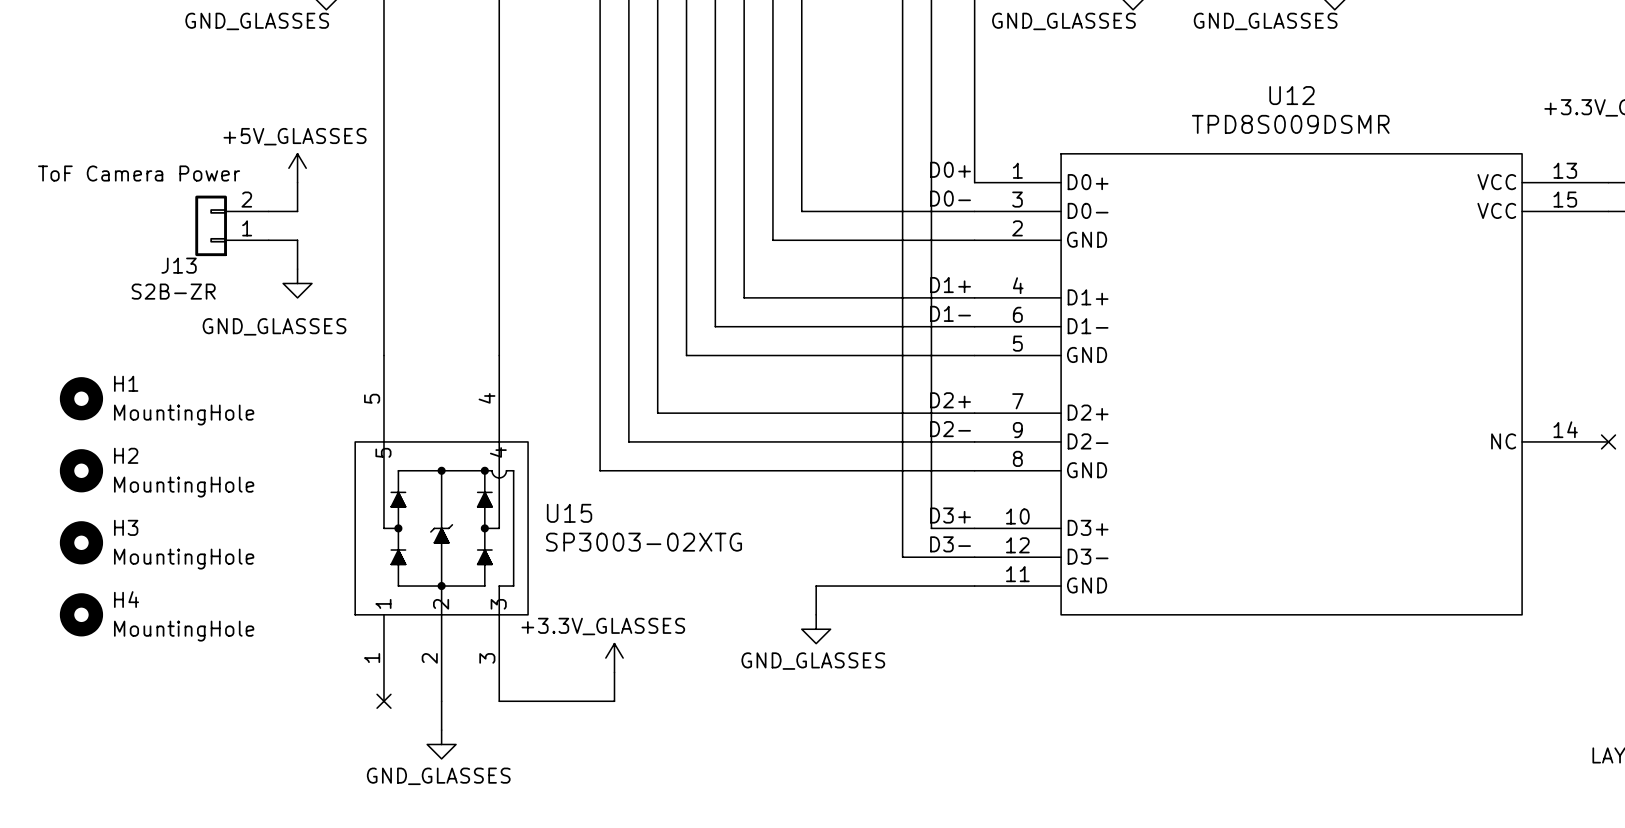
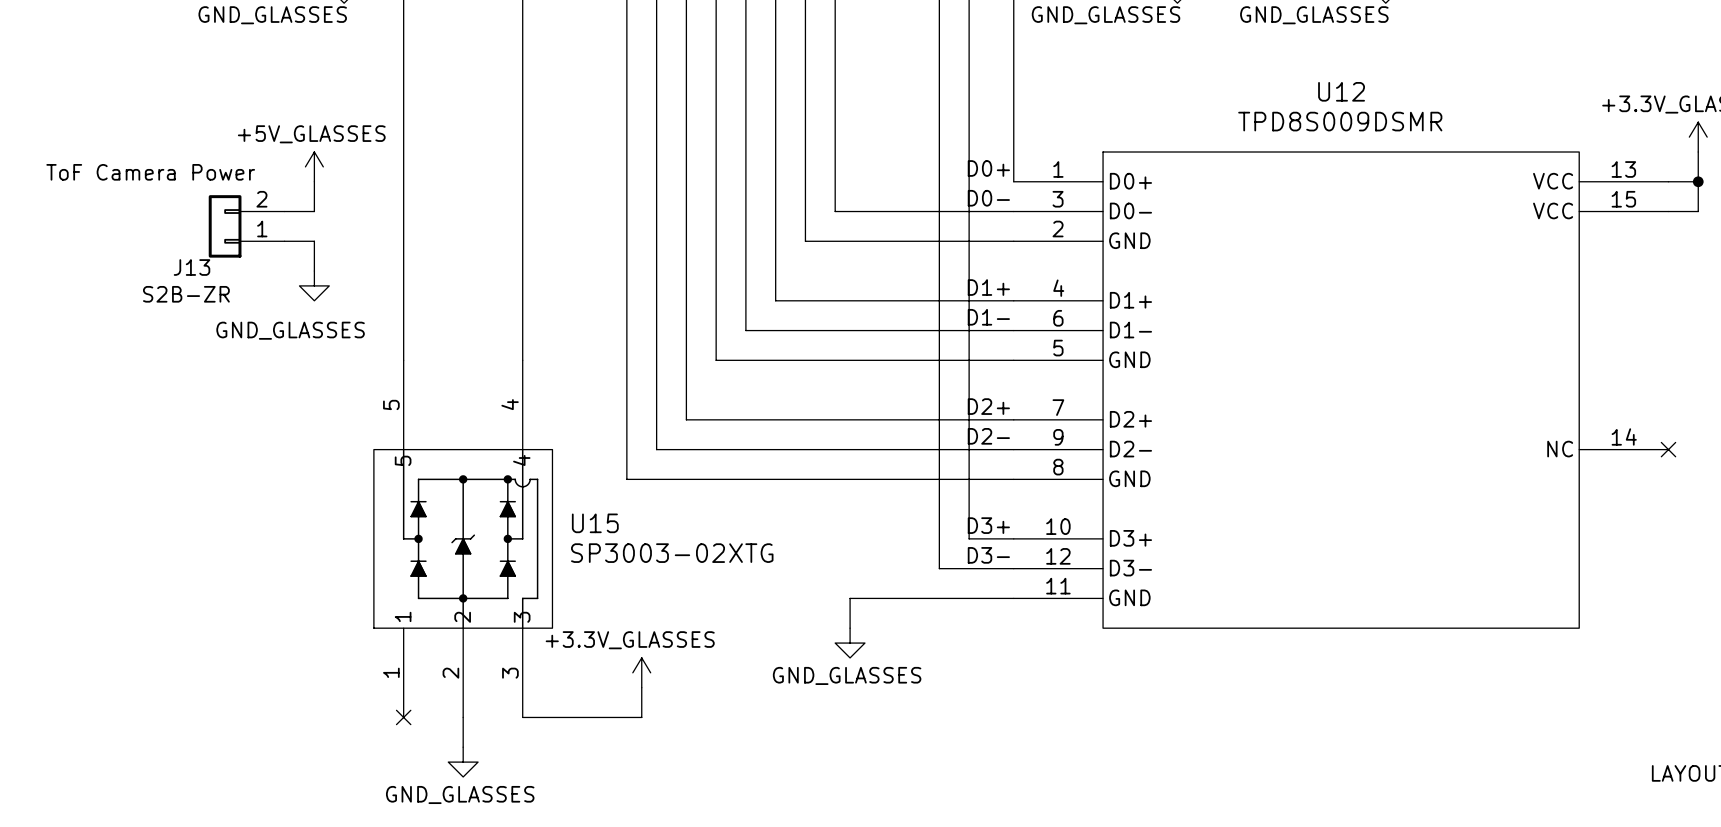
H1: MountingHole (81, 398) -> none
H2: MountingHole (81, 470) -> none
H3: MountingHole (81, 542) -> none
H4: MountingHole (81, 614) -> none

